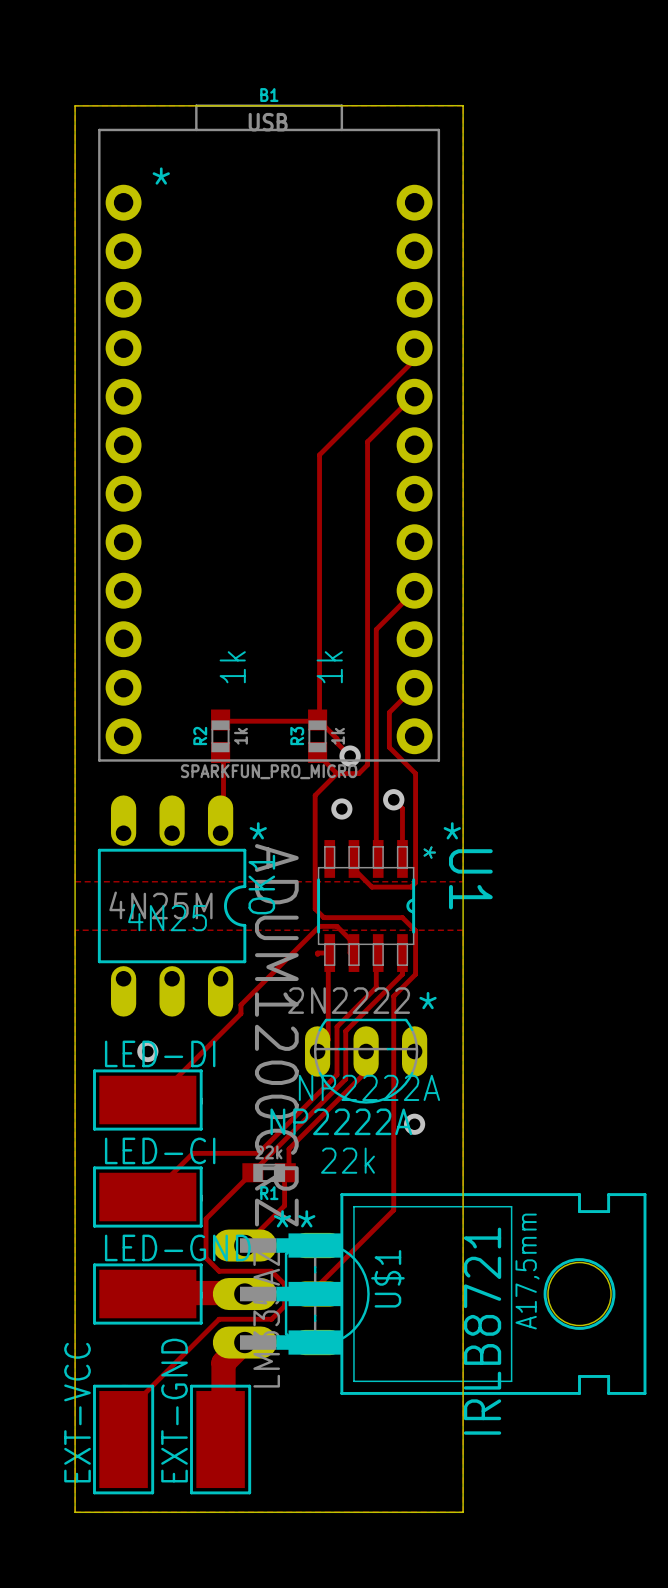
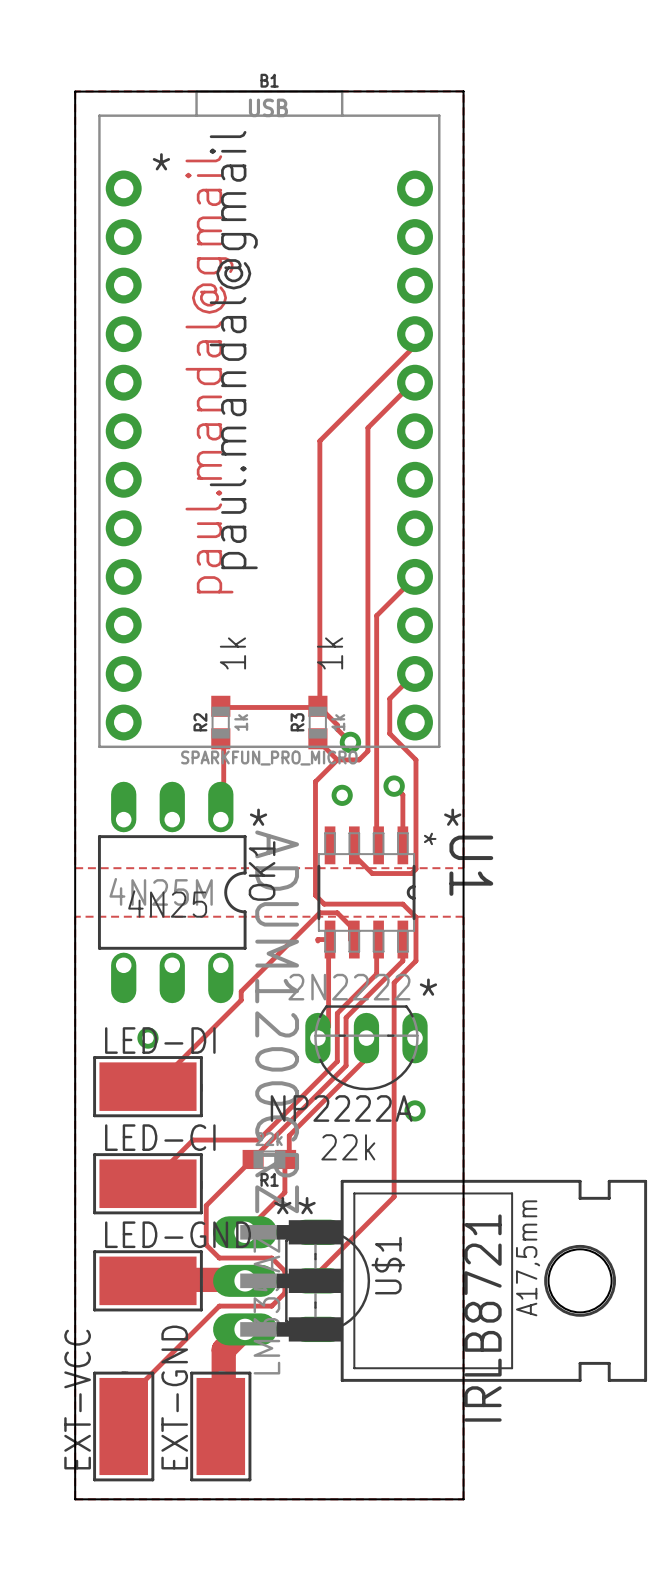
text: none -> paul.mandal@gmail (233, 350)
text: none -> paul.mandal@gmail (209, 374)
text: NP2222A (369, 1087) -> none

